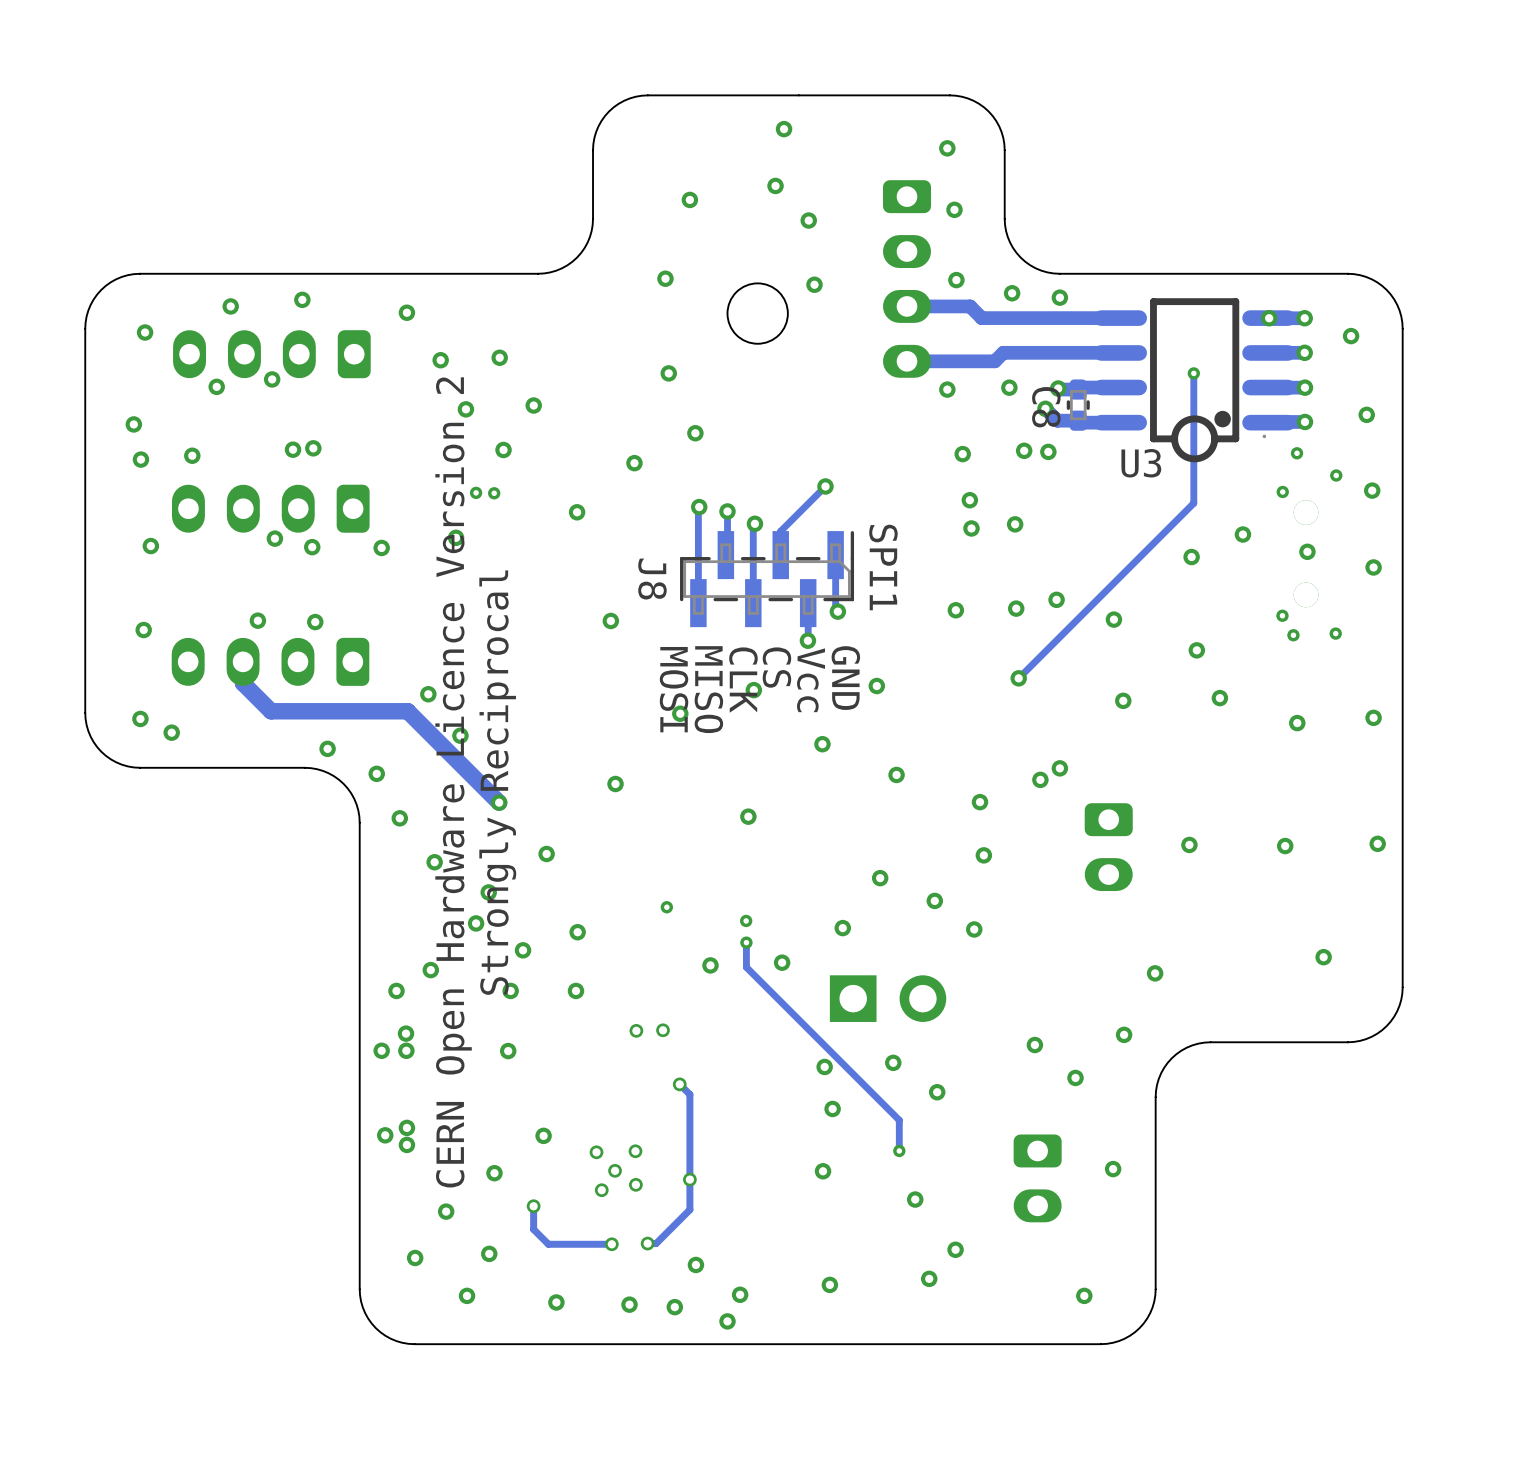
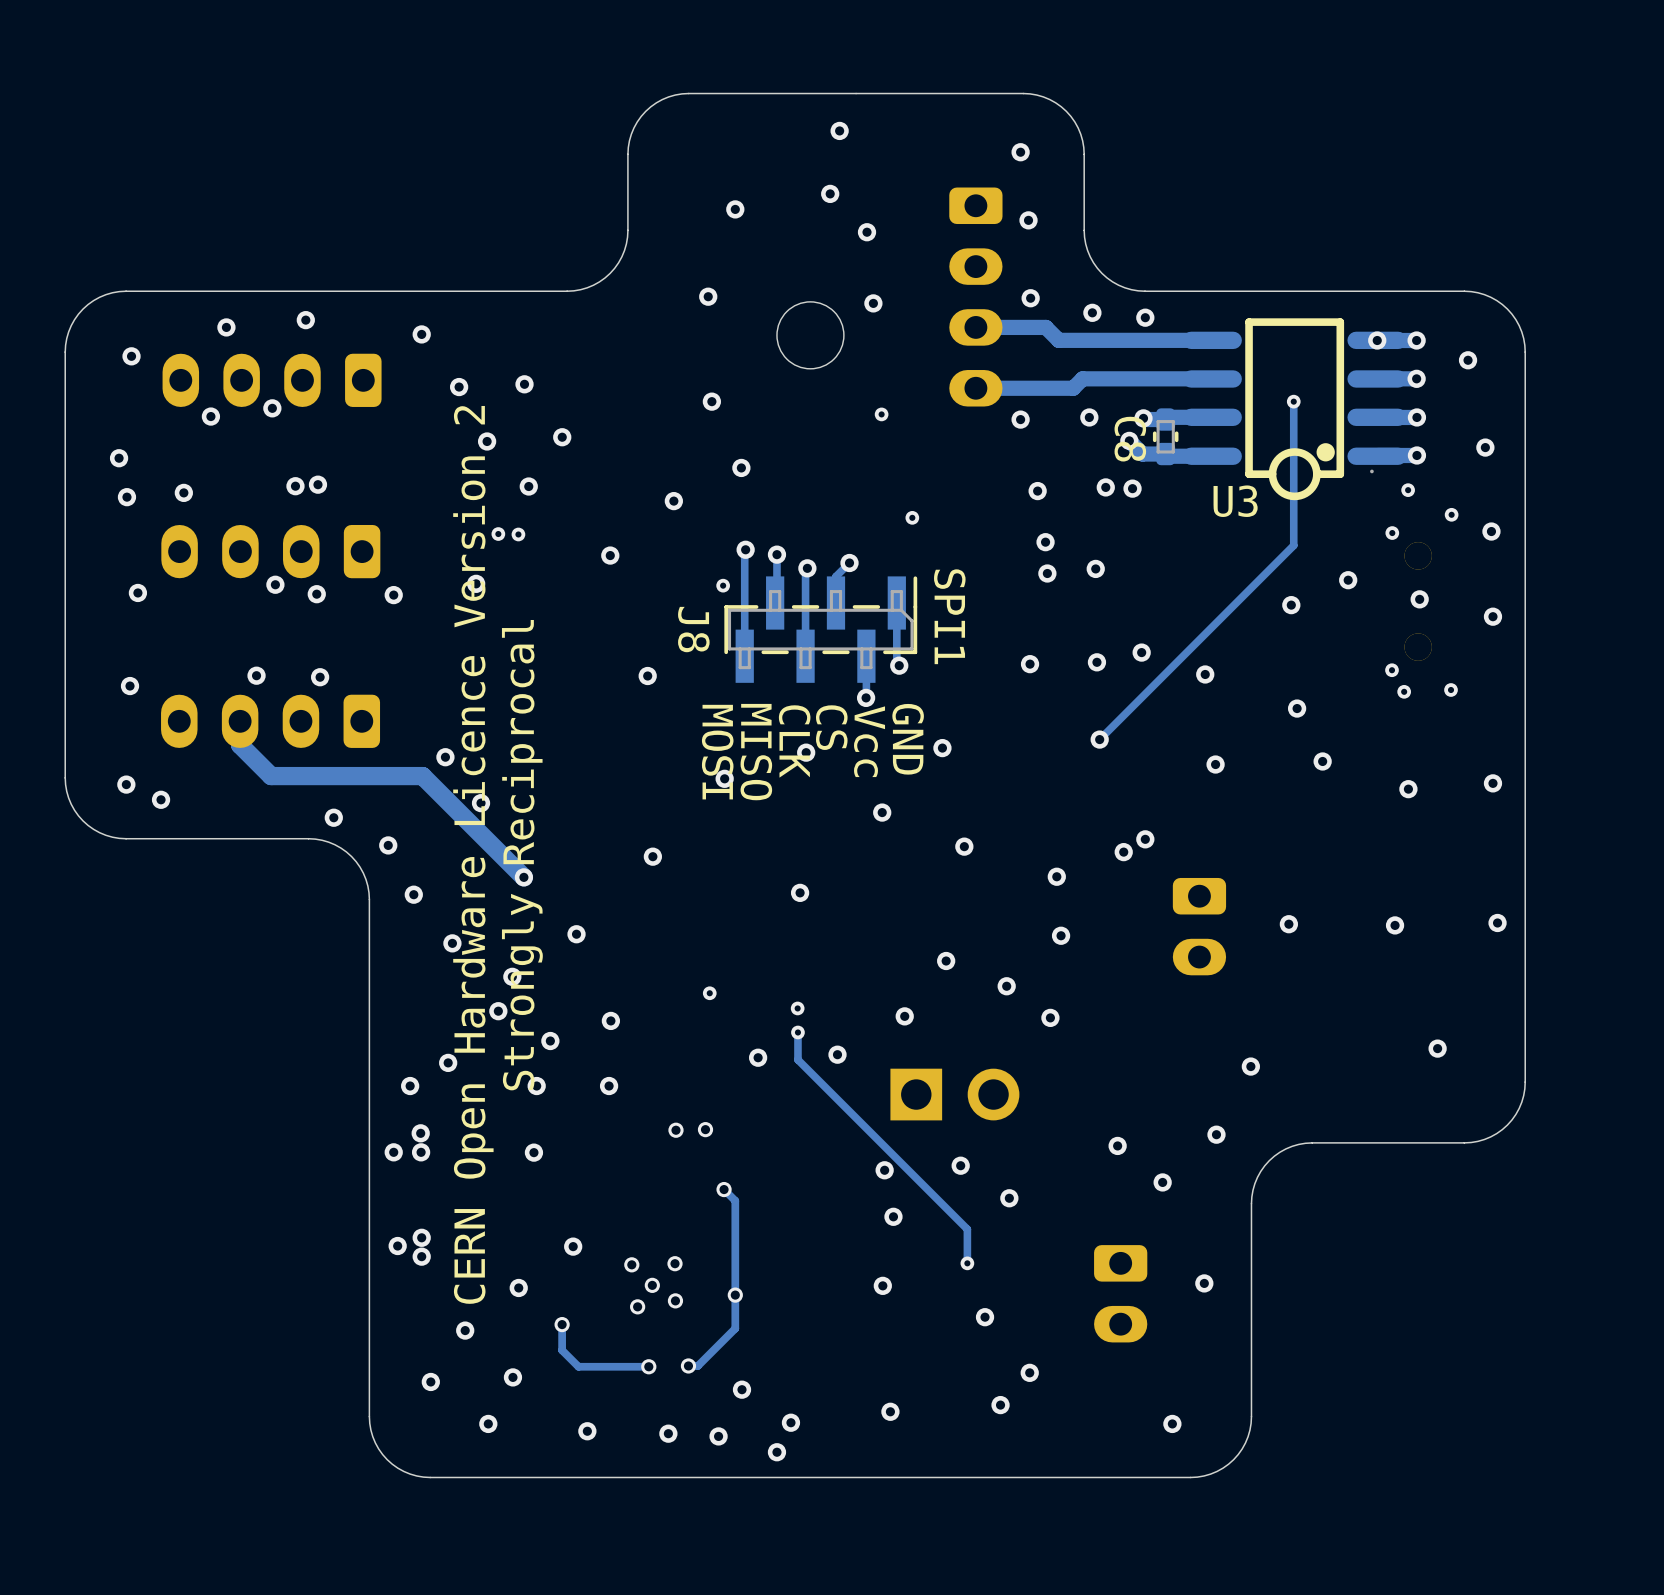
via: none -> (881, 414)
via: none -> (912, 517)
track: (825, 486) (792, 519) -> none
via position: (825, 486) -> (849, 563)
via: none -> (723, 585)

